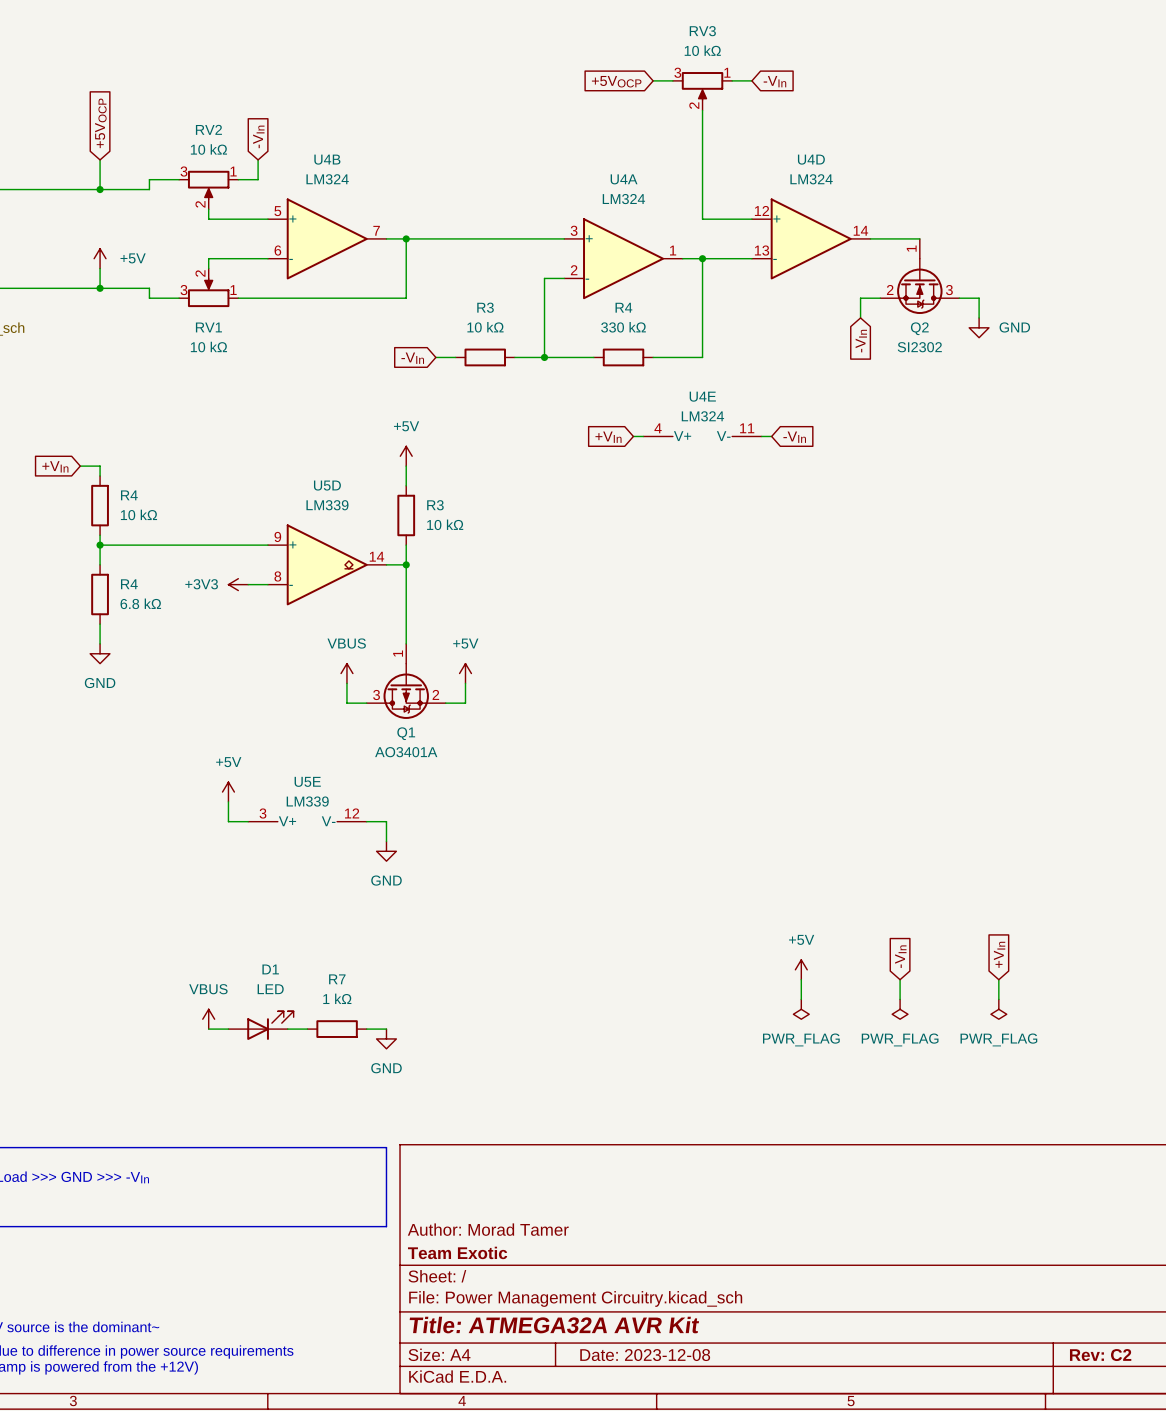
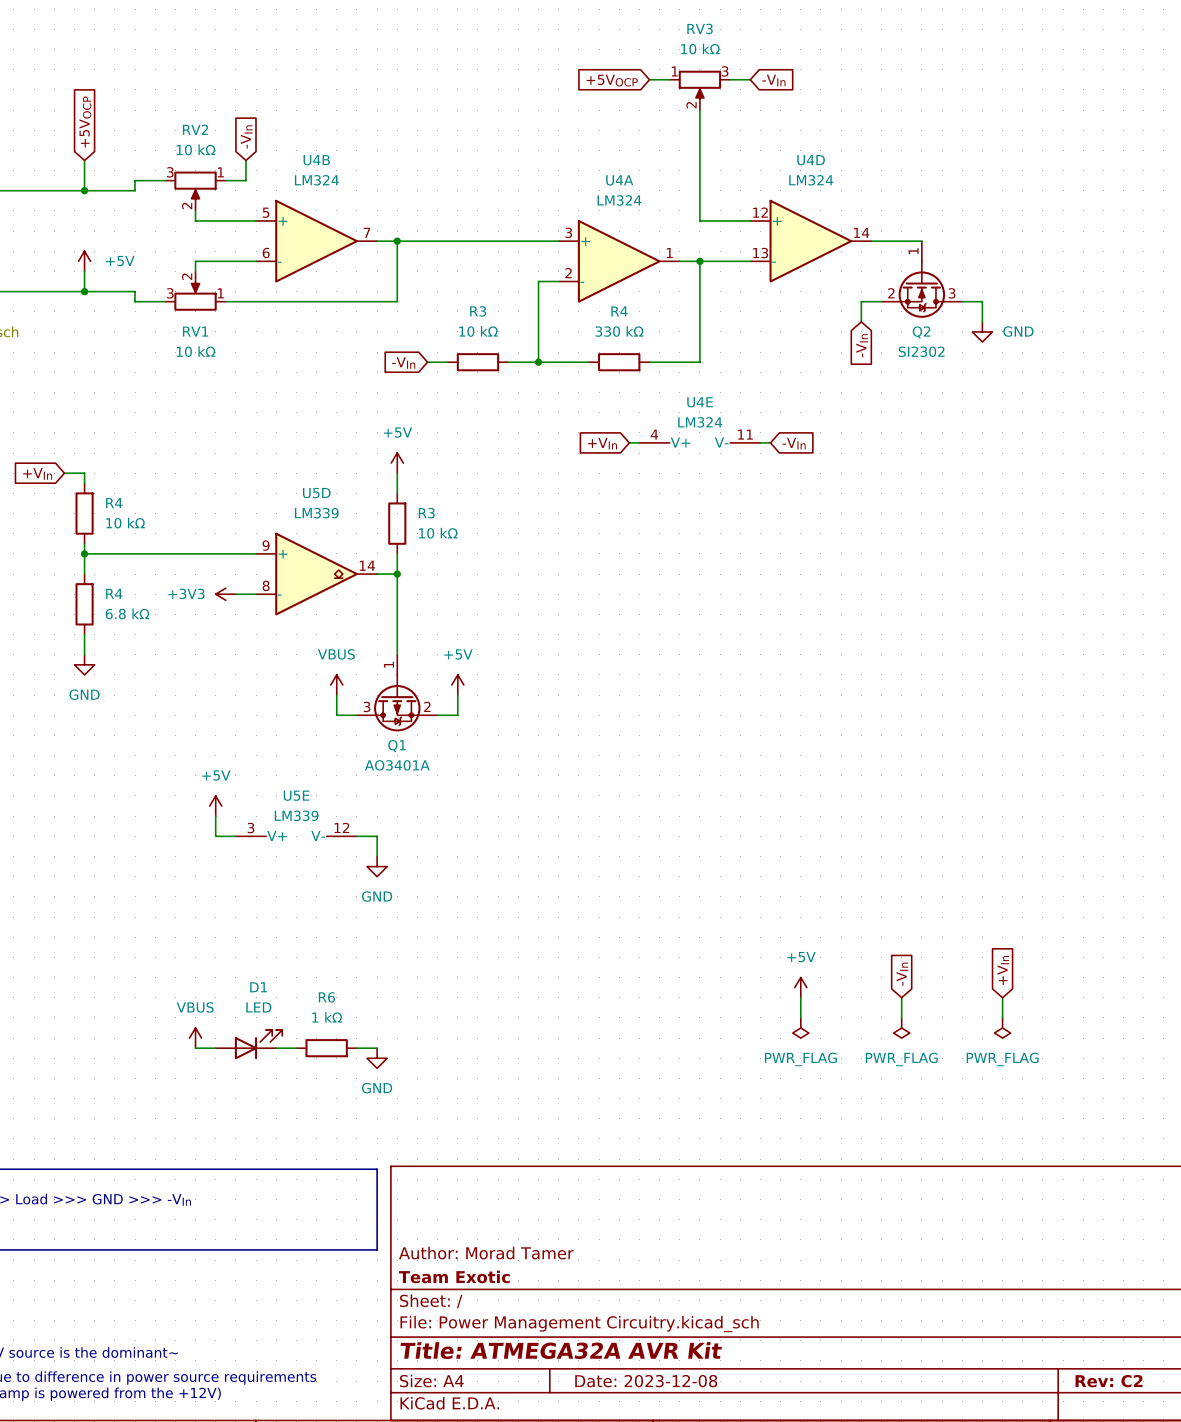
RV3 flip: as is (702, 86) -> left-right (699, 85)
R7 name: R7 (337, 979) -> R6 (326, 997)

